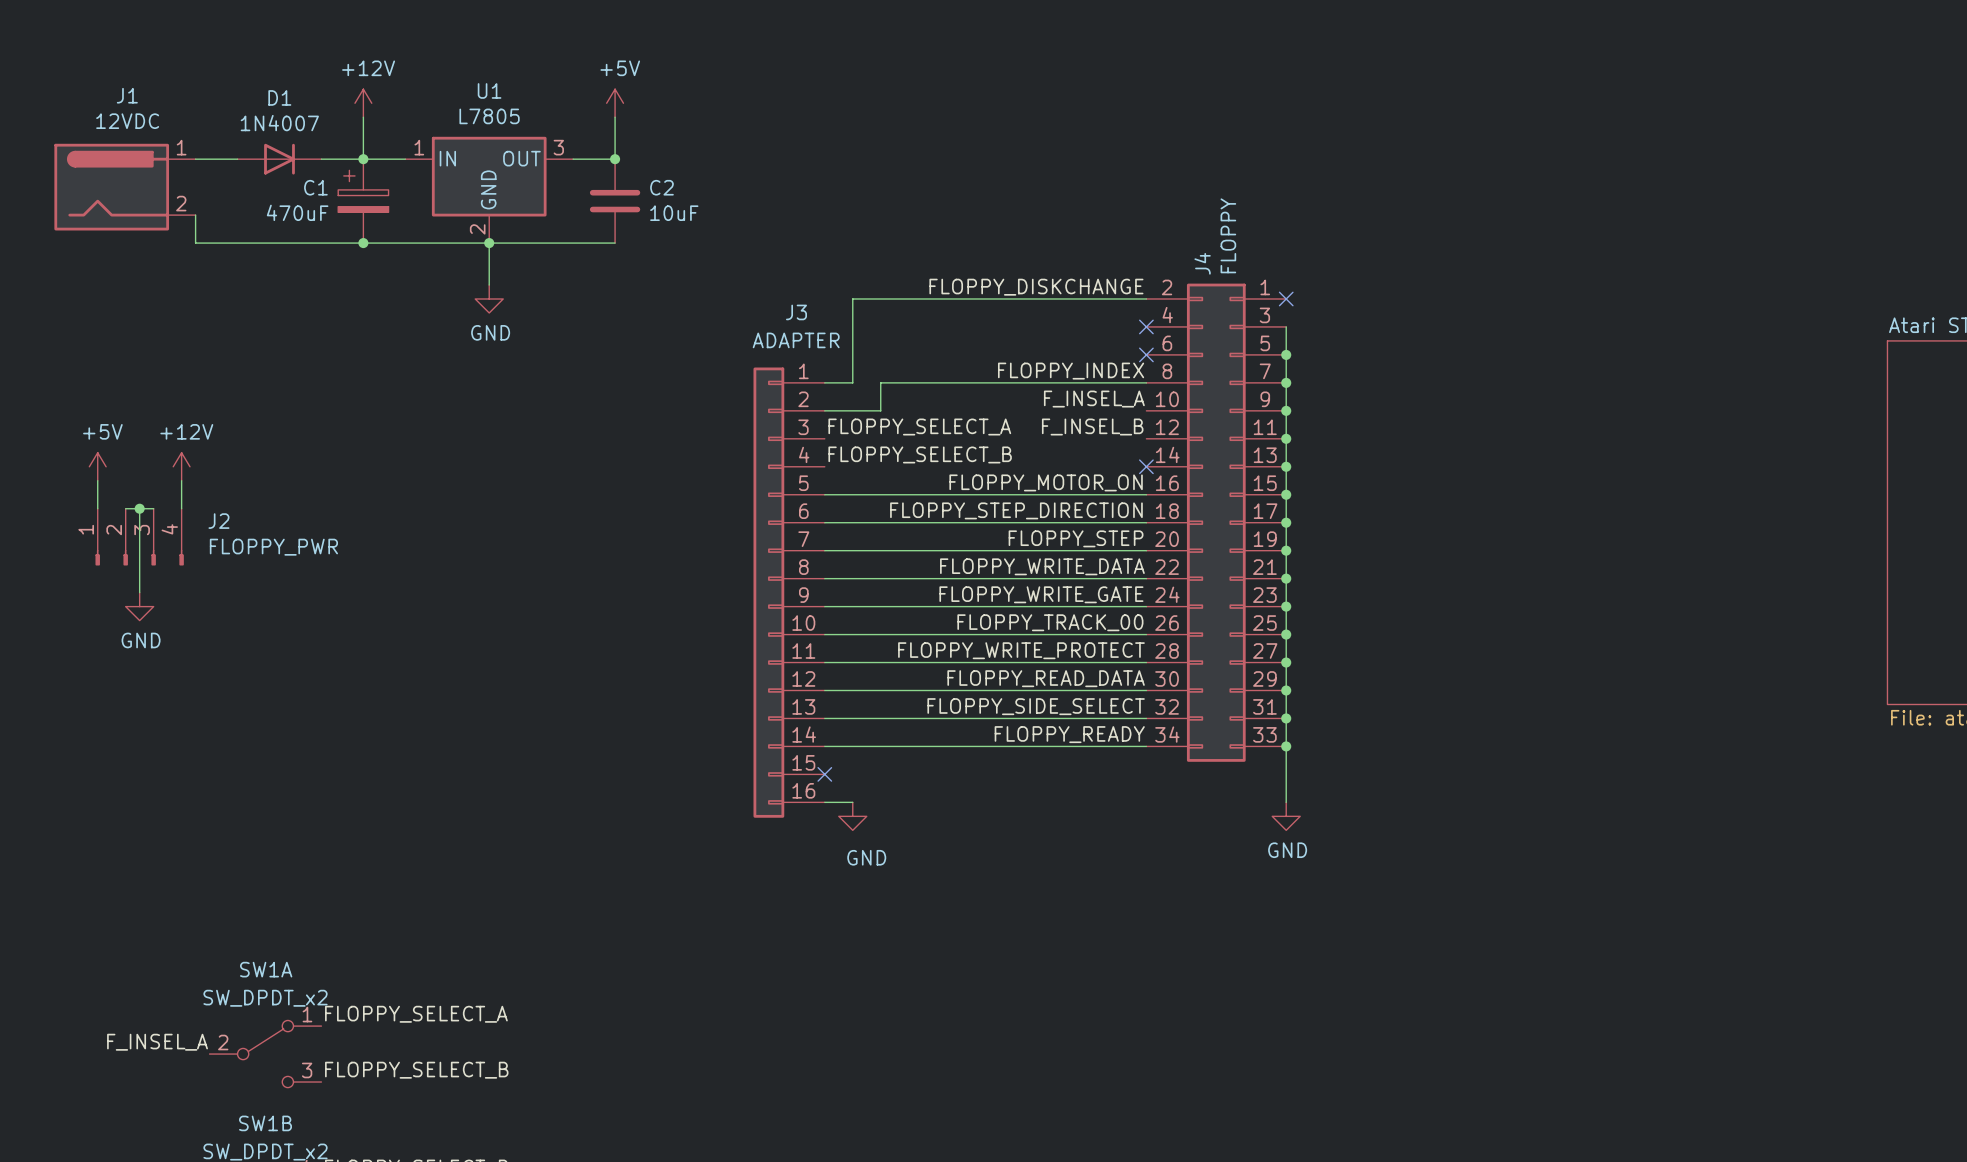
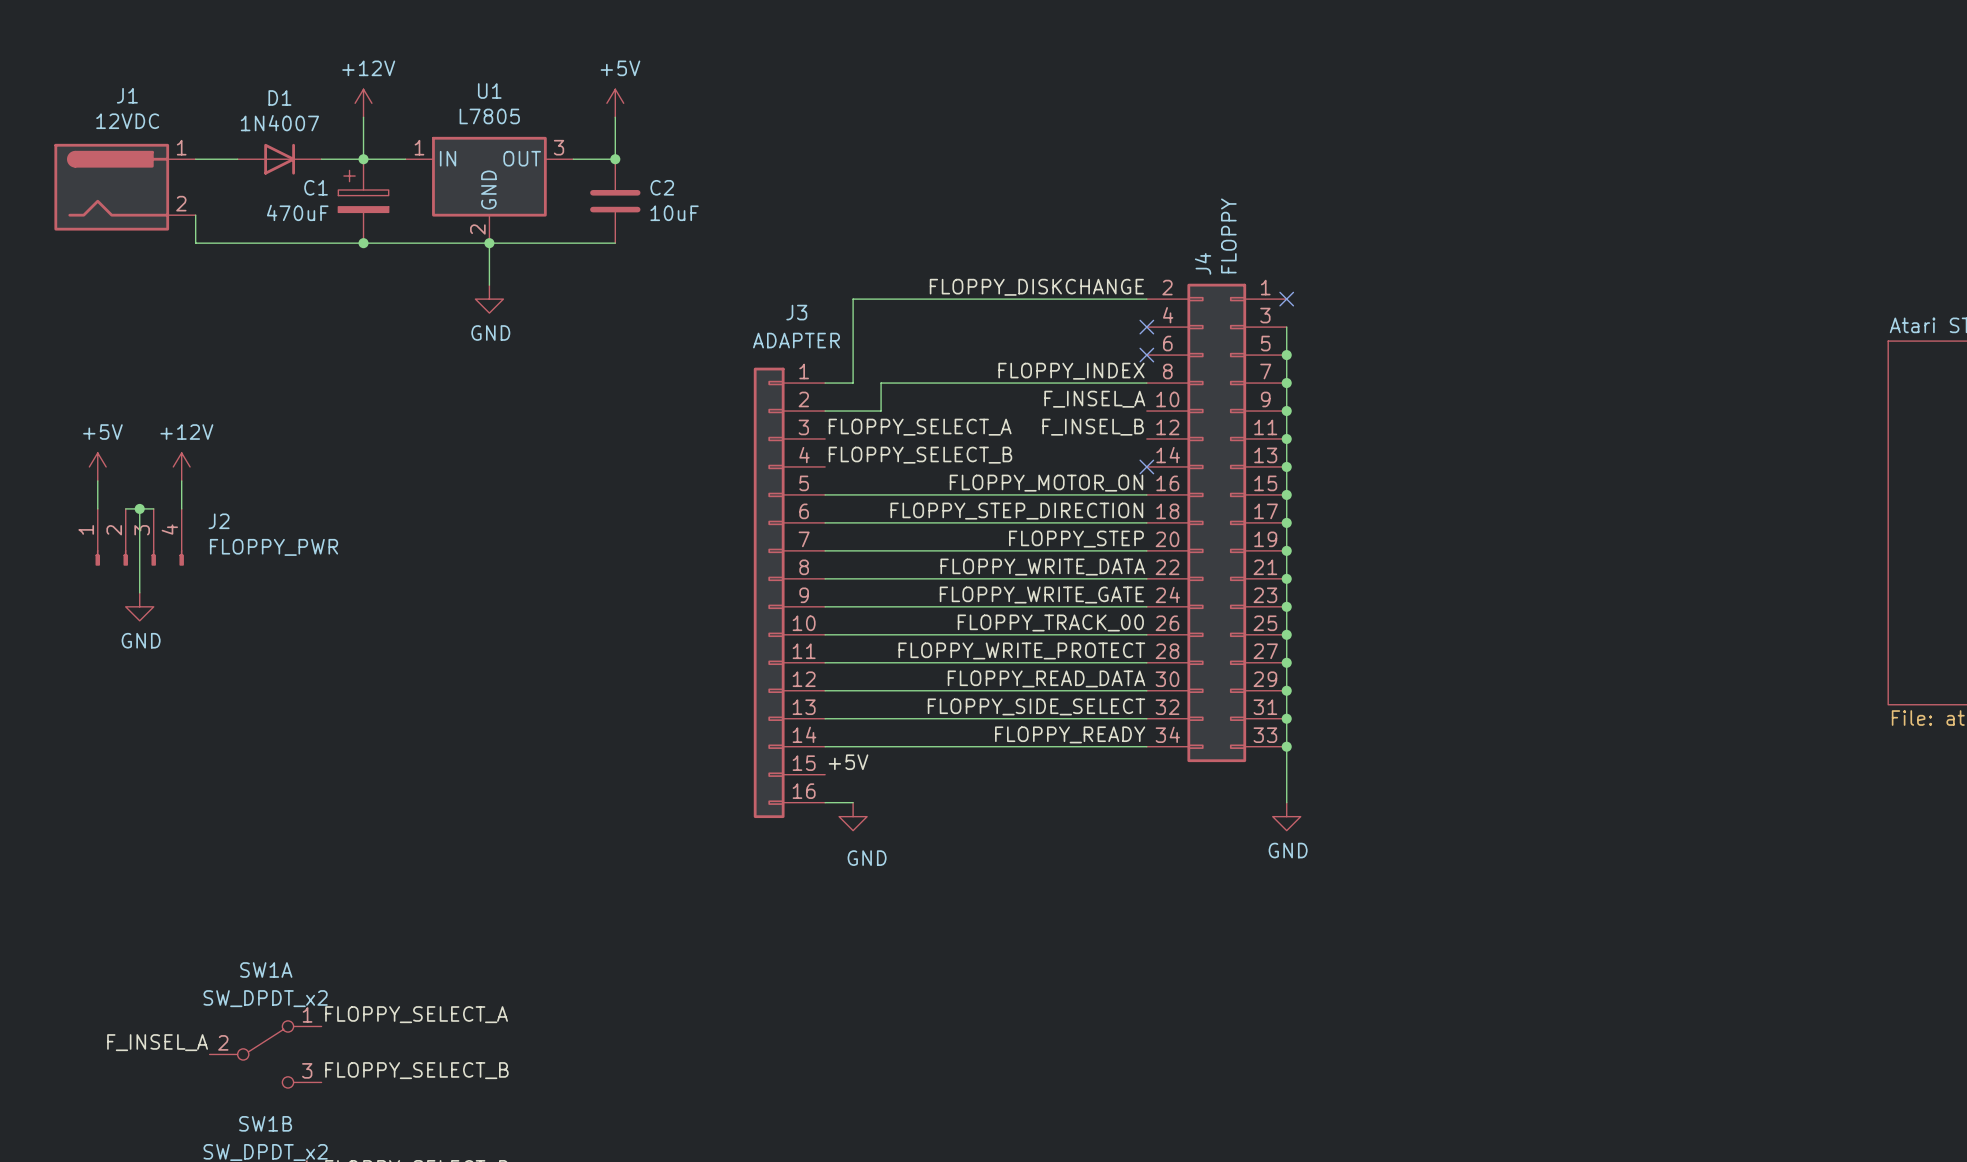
label: none -> +5V (848, 762)
no-connect mark: (824, 774) -> none

